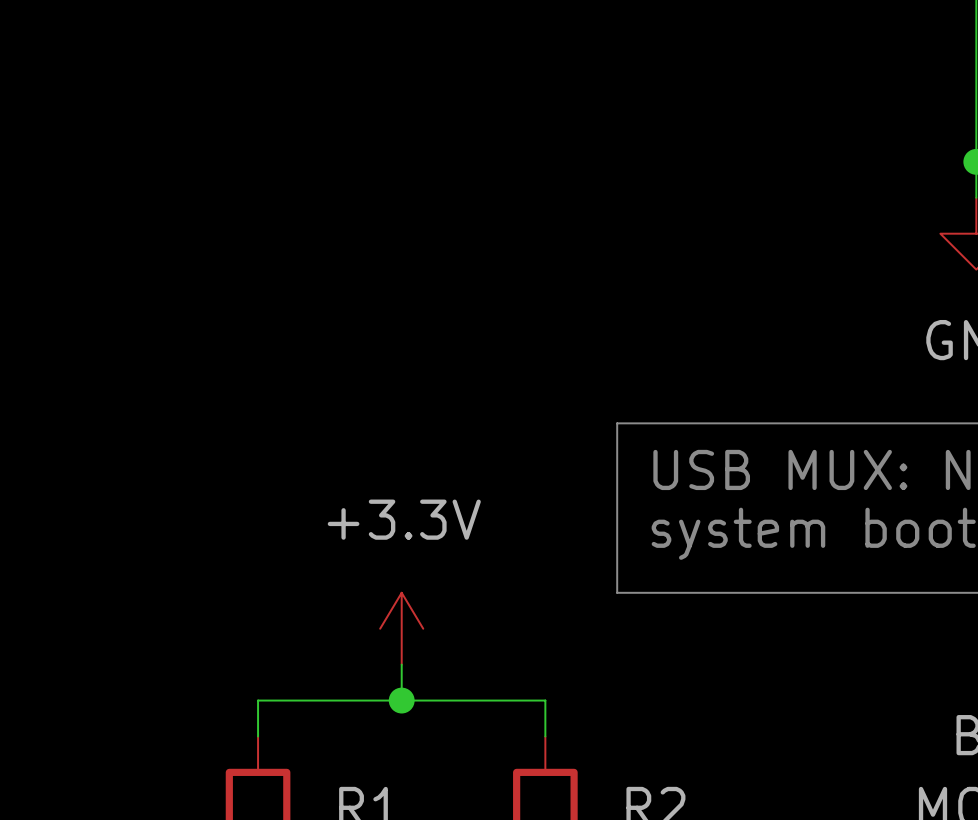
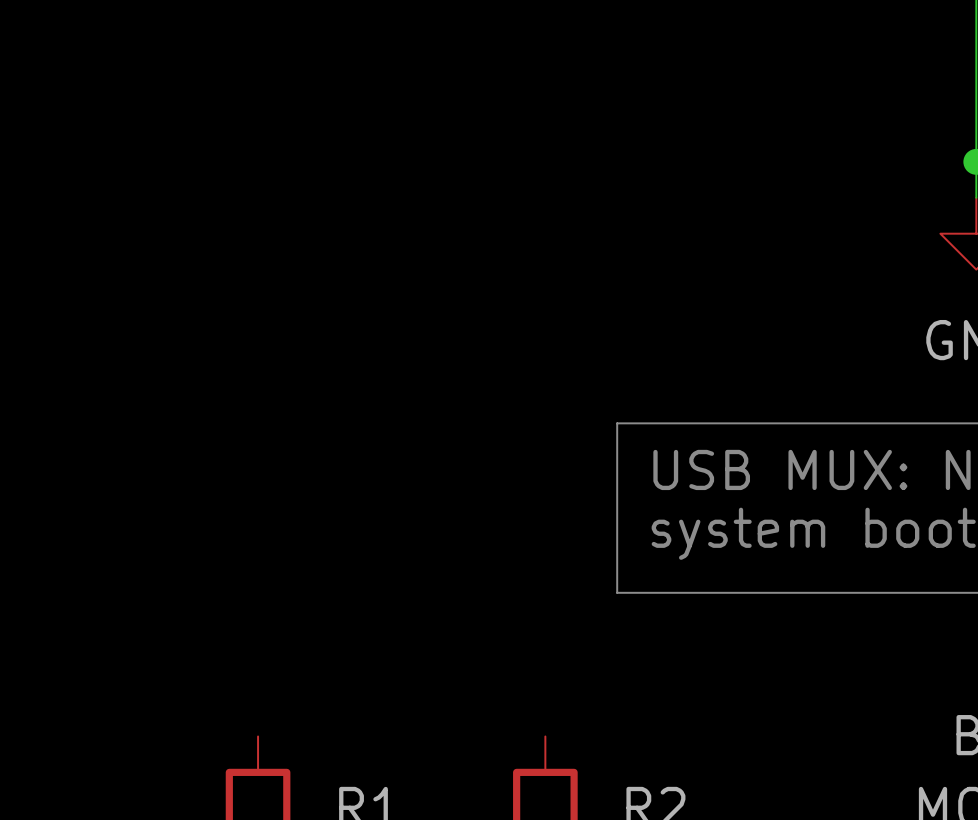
power symbol: +3.3V (401, 628) -> none
wire: (401, 664) (401, 700) -> none
junction: (401, 700) -> none
wire: (258, 736) (258, 700) (545, 700) (545, 736) -> none

